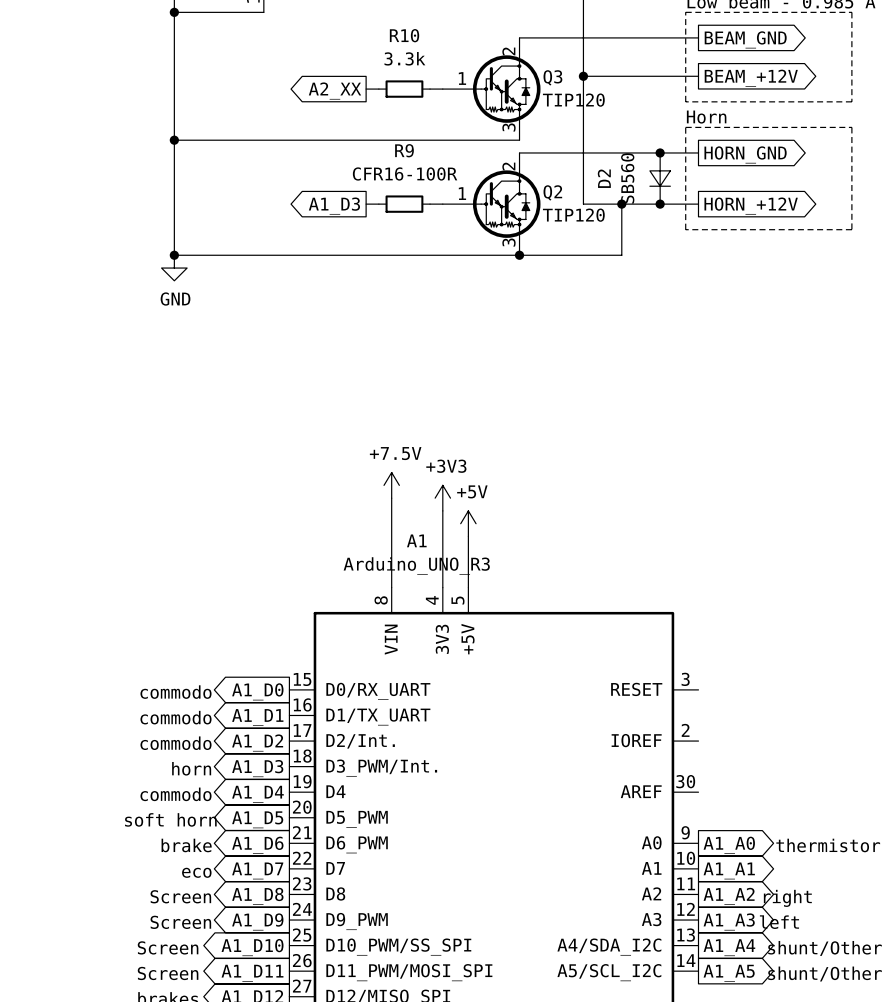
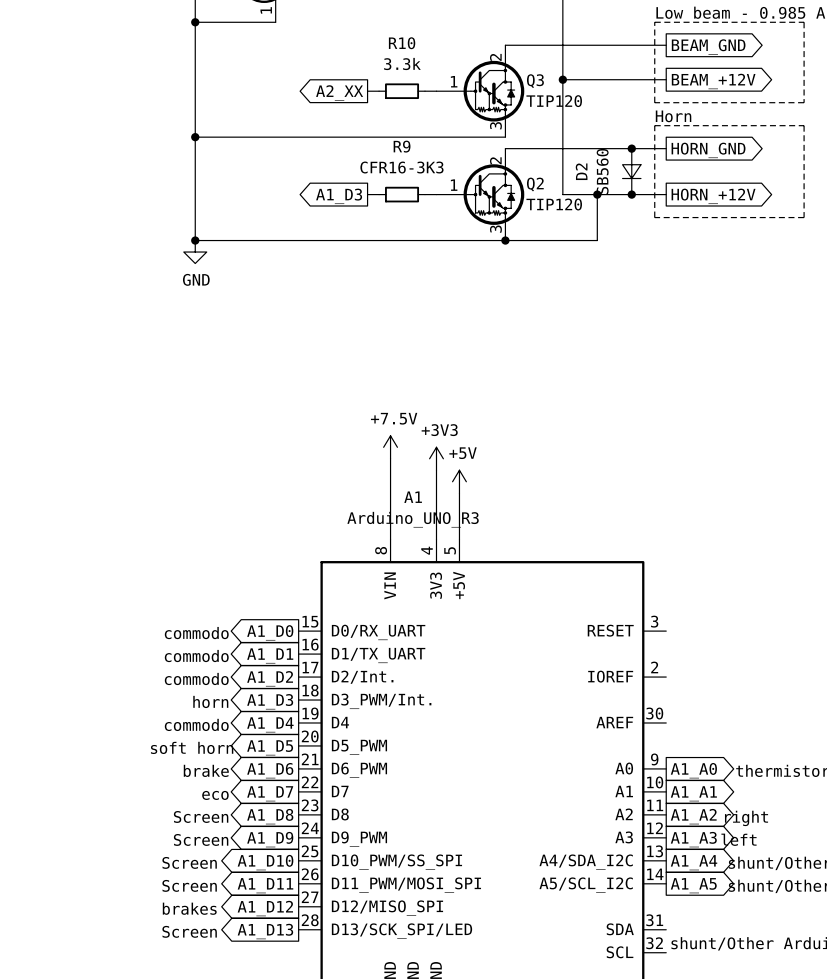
R9 value: CFR16-100R (405, 173) -> CFR16-3K3 (401, 167)

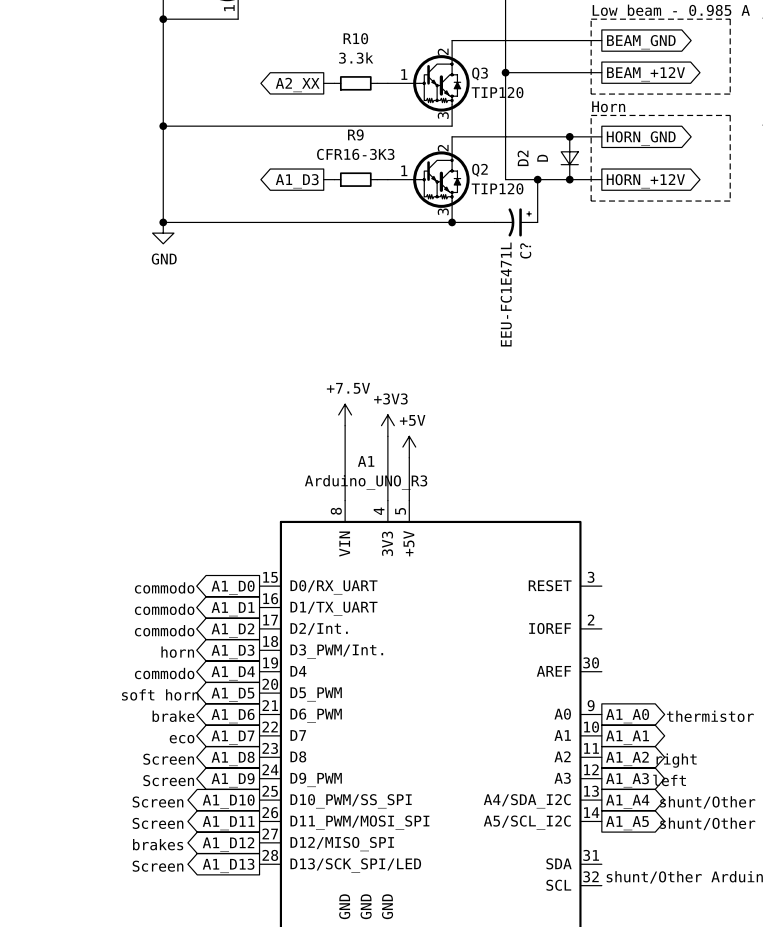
D2 value: SB560 (602, 171) -> D (542, 158)
C?: none -> EEU-FC1E471L (516, 222)

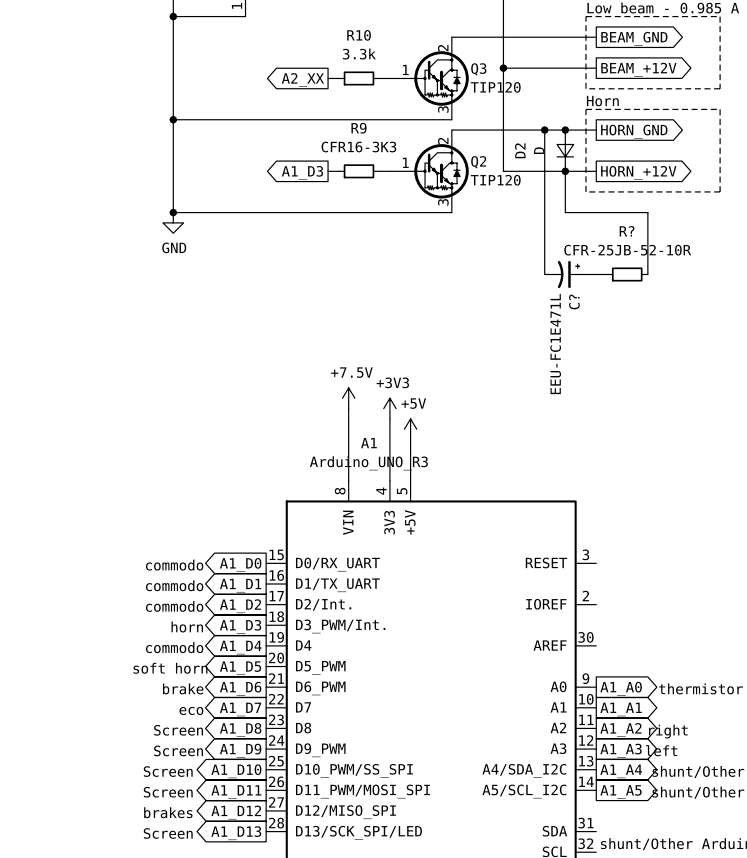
wire: none -> (544, 130) (544, 274)
wire: (537, 179) (537, 222) -> none
junction position: (537, 179) -> (544, 130)
wire: none -> (565, 171) (565, 212) (647, 212) (647, 274)
wire: (452, 222) (494, 222) -> none
junction: (452, 222) -> none
C? position: (516, 222) -> (565, 274)
wire: none -> (585, 274) (606, 274)
R?: none -> CFR-25JB-52-10R (627, 274)

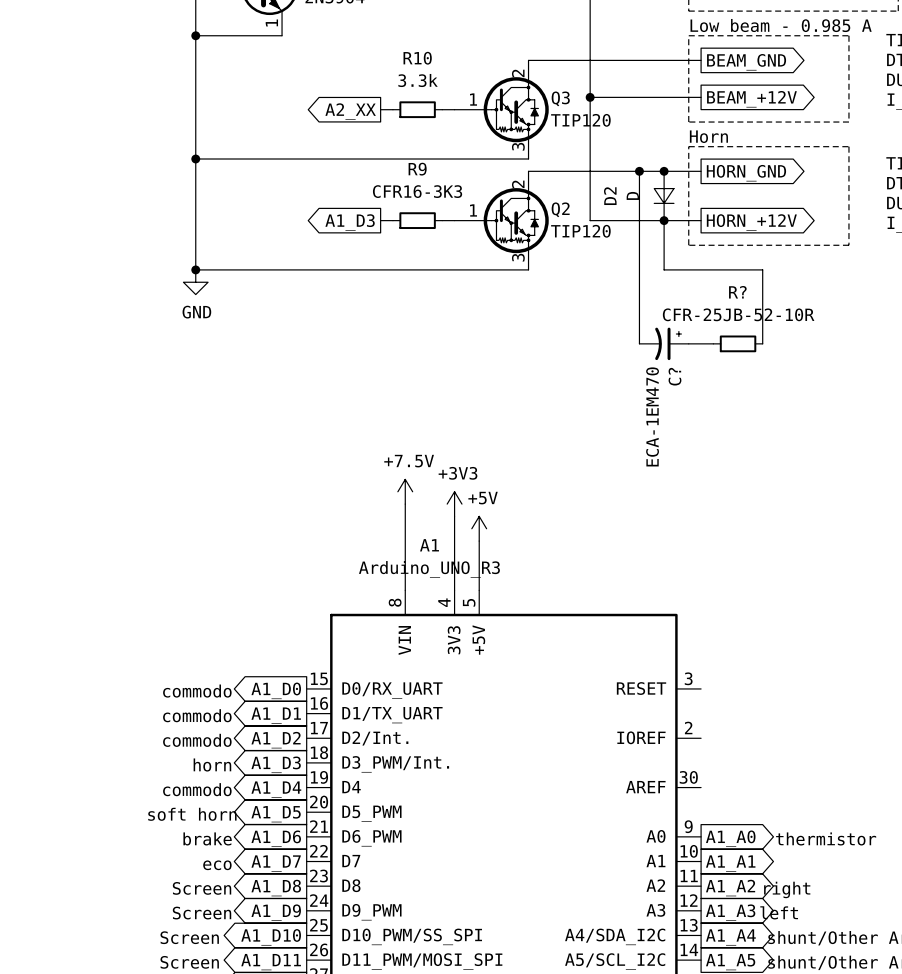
C? value: EEU-FC1E471L (555, 344) -> ECA-1EM470 (652, 416)

